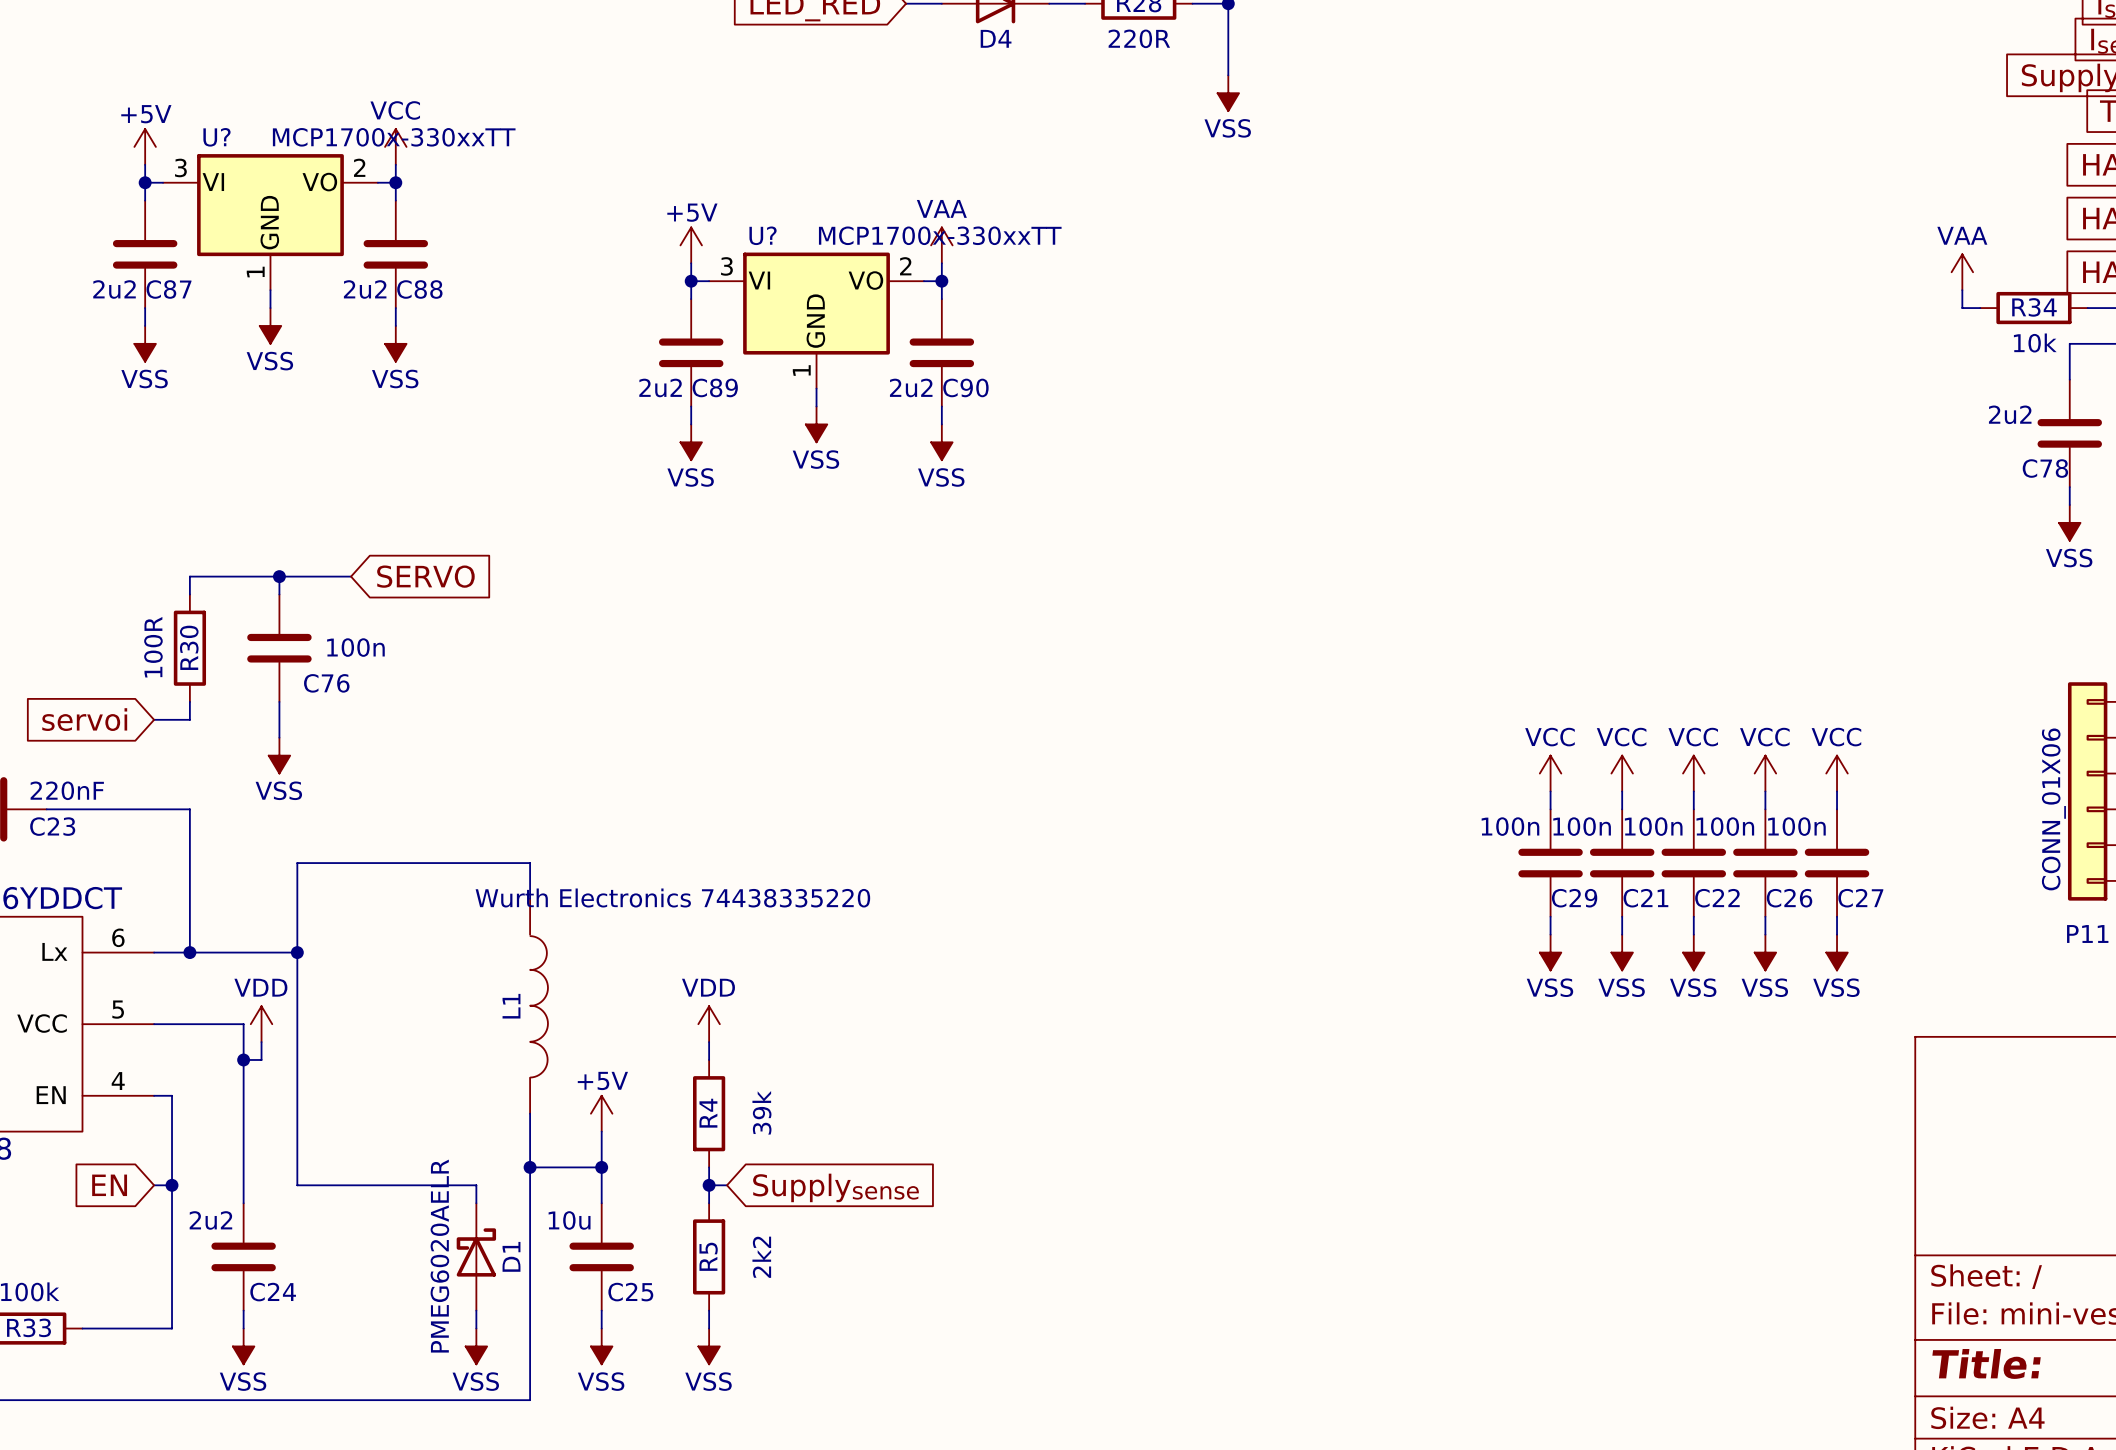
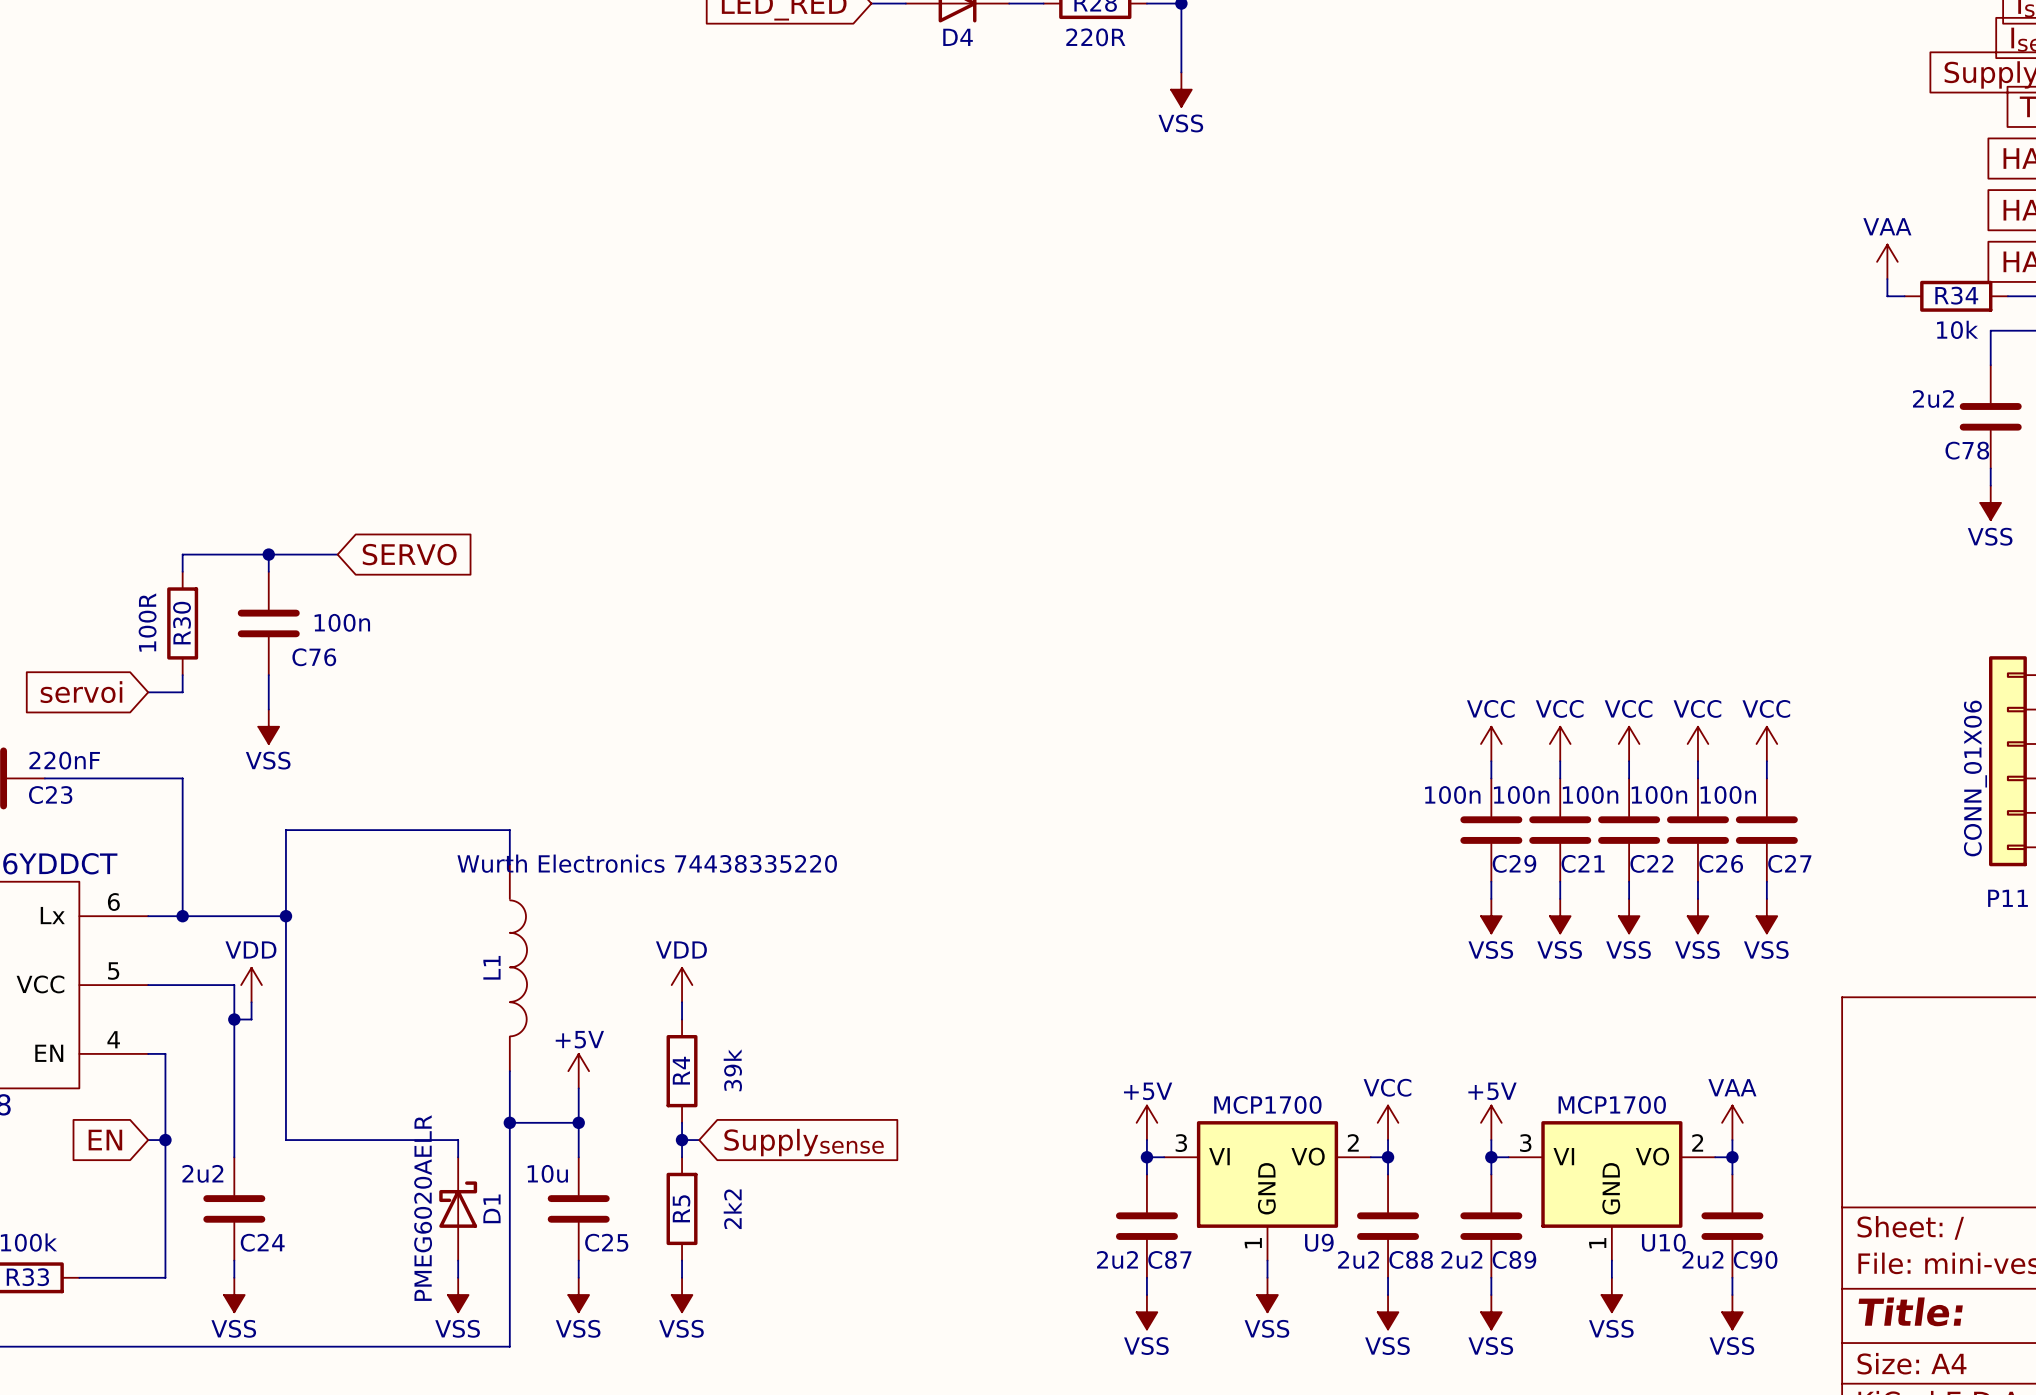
power symbol: +5V (145, 146) -> none
power symbol: VCC (395, 146) -> none
wire: (145, 164) (145, 200) -> none
wire: (395, 164) (395, 200) -> none
wire: (145, 182) (163, 182) -> none
junction: (145, 182) -> none
wire: (377, 182) (395, 182) -> none
junction: (395, 182) -> none
U?: MCP1700x-330xxTT (270, 222) -> none
power symbol: +5V (691, 245) -> none
power symbol: VAA (941, 245) -> none
C87 position: (145, 254) -> (1146, 1226)
C88 position: (395, 254) -> (1388, 1226)
wire: (691, 263) (691, 299) -> none
wire: (941, 263) (941, 299) -> none
wire: (691, 281) (709, 281) -> none
junction: (691, 281) -> none
wire: (923, 281) (941, 281) -> none
junction: (941, 281) -> none
wire: (270, 290) (270, 308) -> none
wire: (145, 308) (145, 325) -> none
wire: (395, 308) (395, 325) -> none
U?: MCP1700x-330xxTT (816, 320) -> none
power symbol: VSS (270, 325) -> none
power symbol: VSS (145, 343) -> none
power symbol: VSS (395, 343) -> none
C89 position: (691, 352) -> (1491, 1226)
C90 position: (941, 352) -> (1732, 1226)
wire: (816, 388) (816, 406) -> none
wire: (691, 406) (691, 424) -> none
wire: (941, 406) (941, 424) -> none
power symbol: VSS (816, 424) -> none
power symbol: VSS (691, 442) -> none
power symbol: VSS (941, 442) -> none
power symbol: none -> +5V (1146, 1122)
power symbol: none -> VCC (1388, 1122)
power symbol: none -> +5V (1491, 1122)
power symbol: none -> VAA (1732, 1122)
wire: none -> (1146, 1140) (1146, 1174)
wire: none -> (1388, 1140) (1388, 1174)
wire: none -> (1491, 1140) (1491, 1174)
wire: none -> (1732, 1140) (1732, 1174)
wire: none -> (1146, 1157) (1164, 1157)
junction: none -> (1146, 1157)
wire: none -> (1370, 1157) (1388, 1157)
junction: none -> (1388, 1157)
wire: none -> (1491, 1157) (1508, 1157)
junction: none -> (1491, 1157)
wire: none -> (1715, 1157) (1732, 1157)
junction: none -> (1732, 1157)
U9: none -> MCP1700 (1267, 1190)
U10: none -> MCP1700 (1611, 1190)
wire: none -> (1267, 1260) (1267, 1277)
wire: none -> (1611, 1260) (1611, 1277)
wire: none -> (1146, 1277) (1146, 1295)
wire: none -> (1388, 1277) (1388, 1295)
wire: none -> (1491, 1277) (1491, 1295)
wire: none -> (1732, 1277) (1732, 1295)
power symbol: none -> VSS (1267, 1295)
power symbol: none -> VSS (1611, 1295)
power symbol: none -> VSS (1146, 1312)
power symbol: none -> VSS (1388, 1312)
power symbol: none -> VSS (1491, 1312)
power symbol: none -> VSS (1732, 1312)

